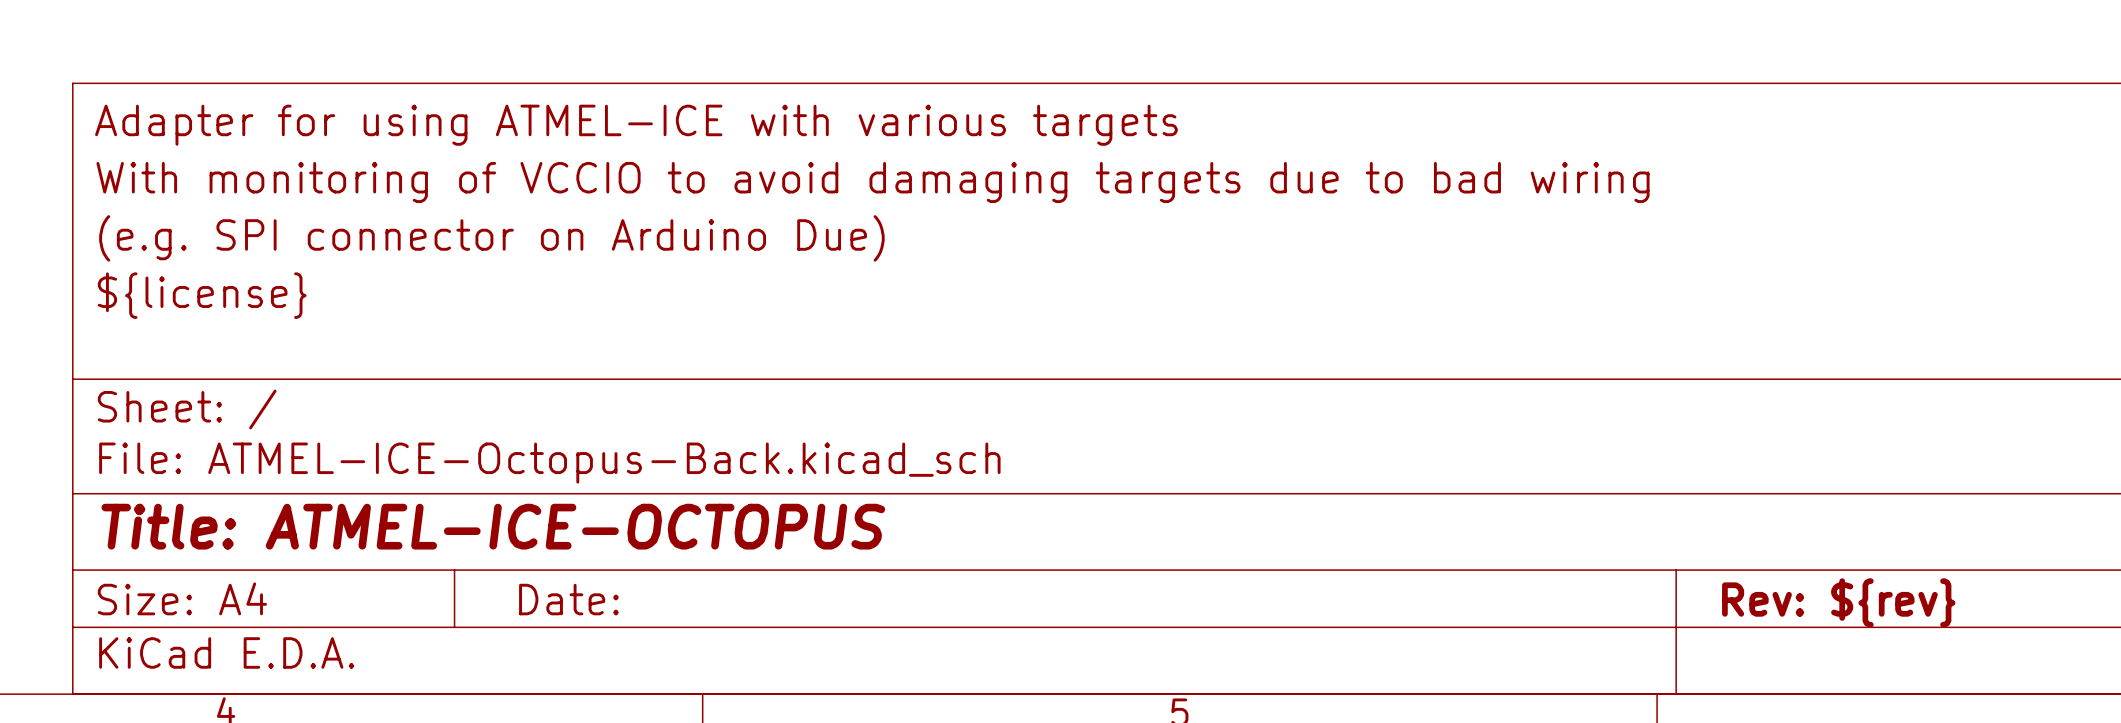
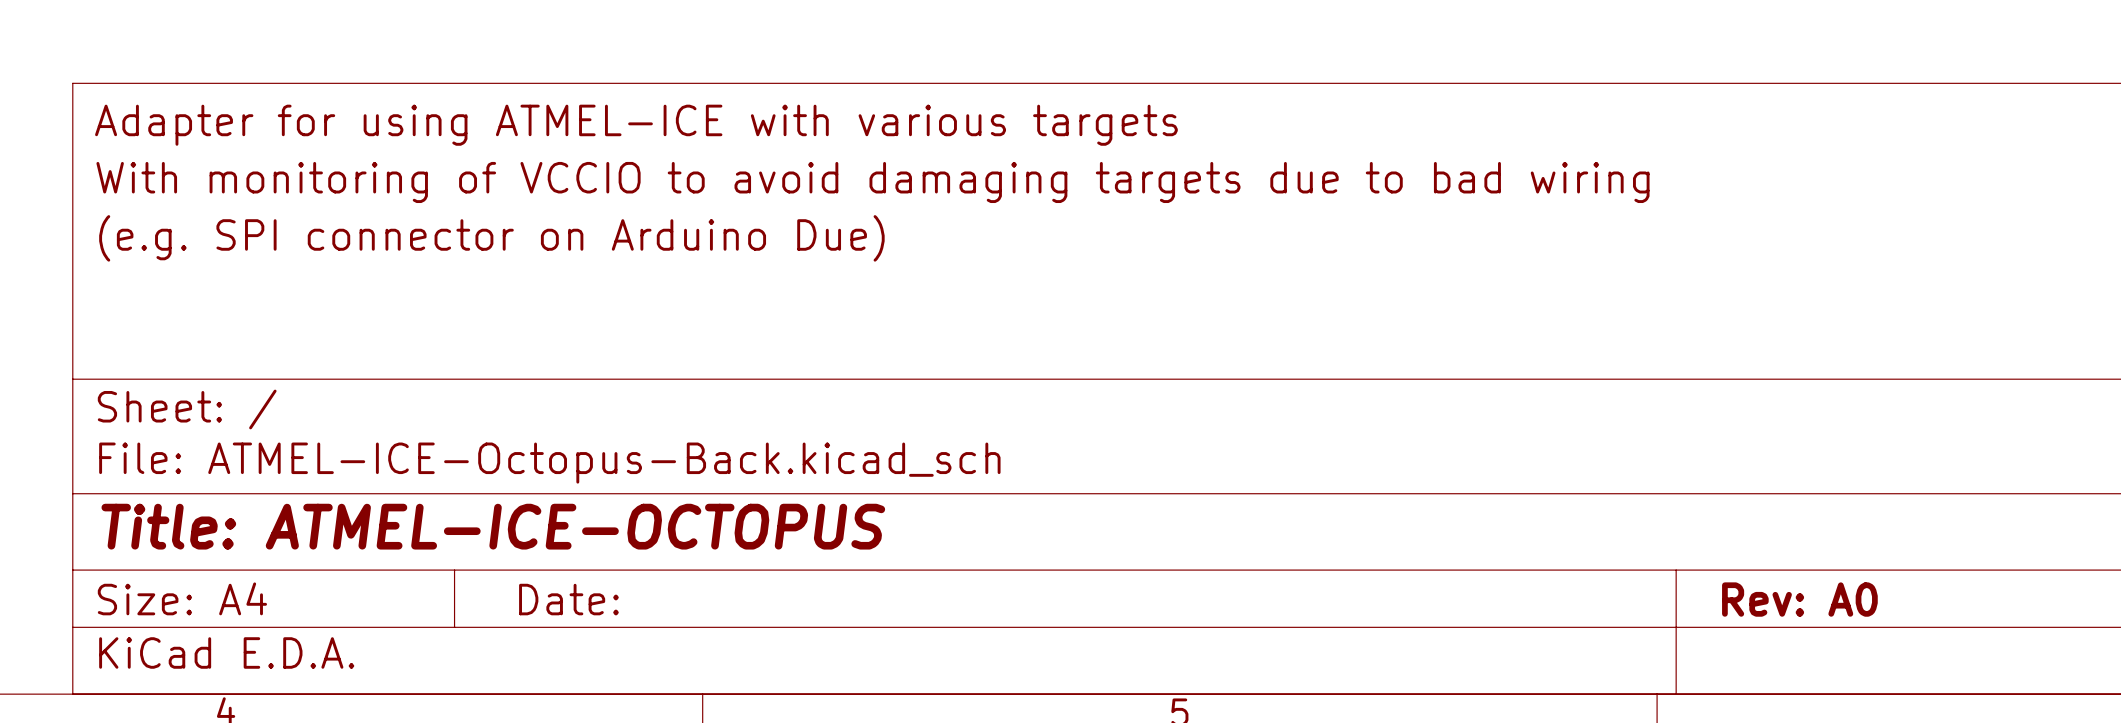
title block: ${license} (202, 295) -> none
title block: Rev: ${rev} (1838, 602) -> Rev: A0 (1799, 599)

